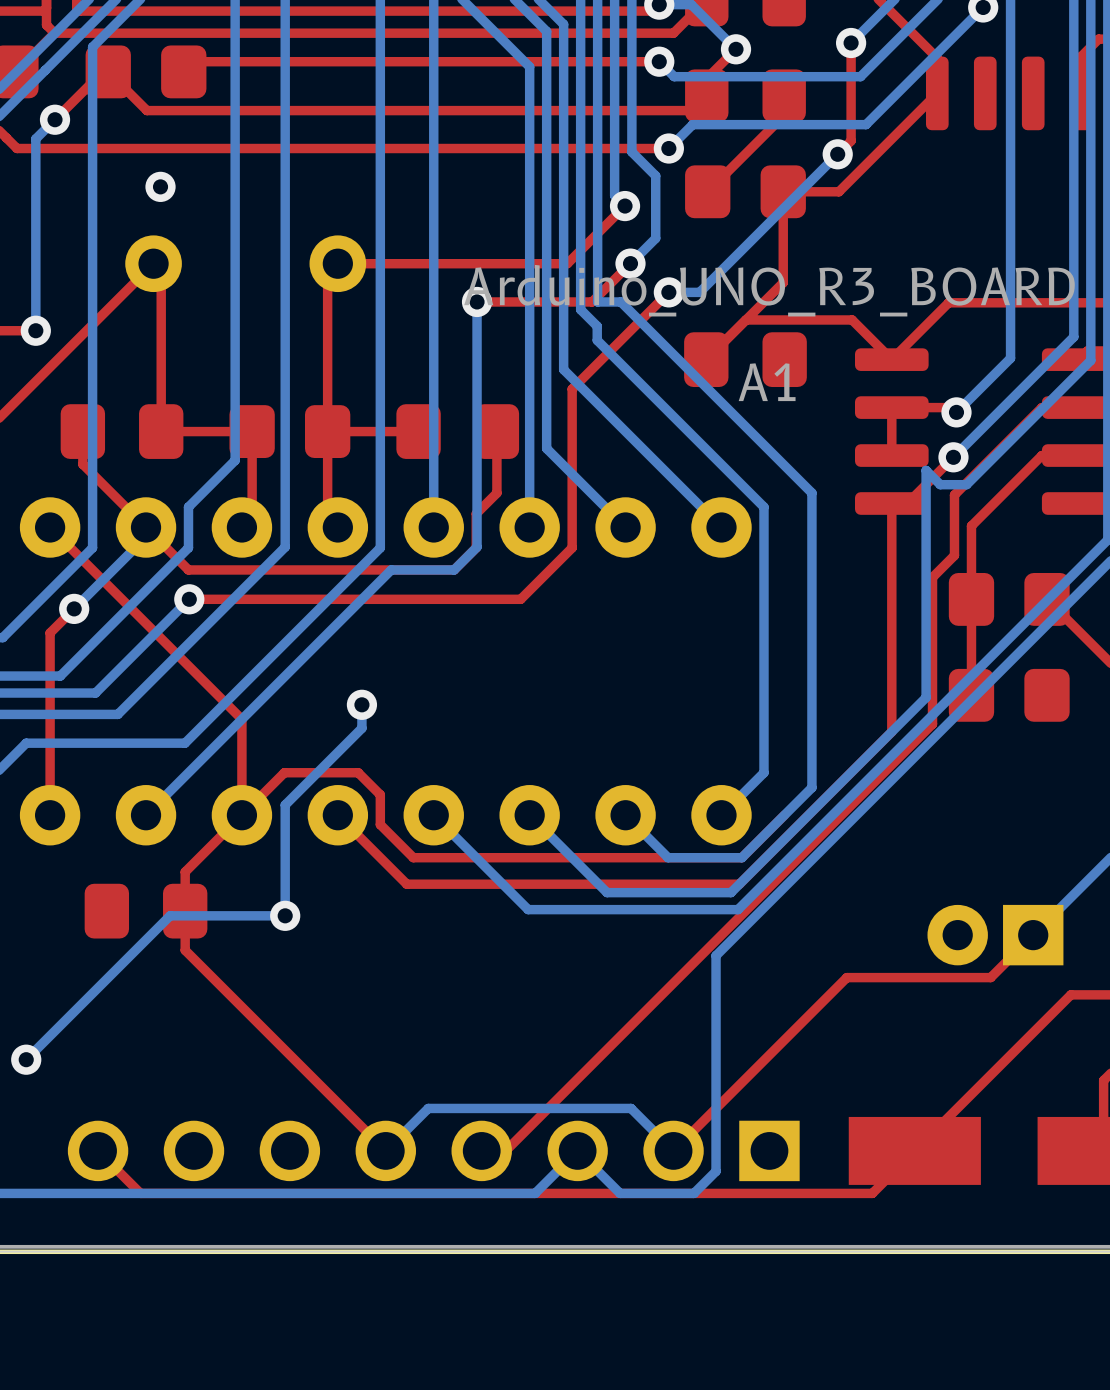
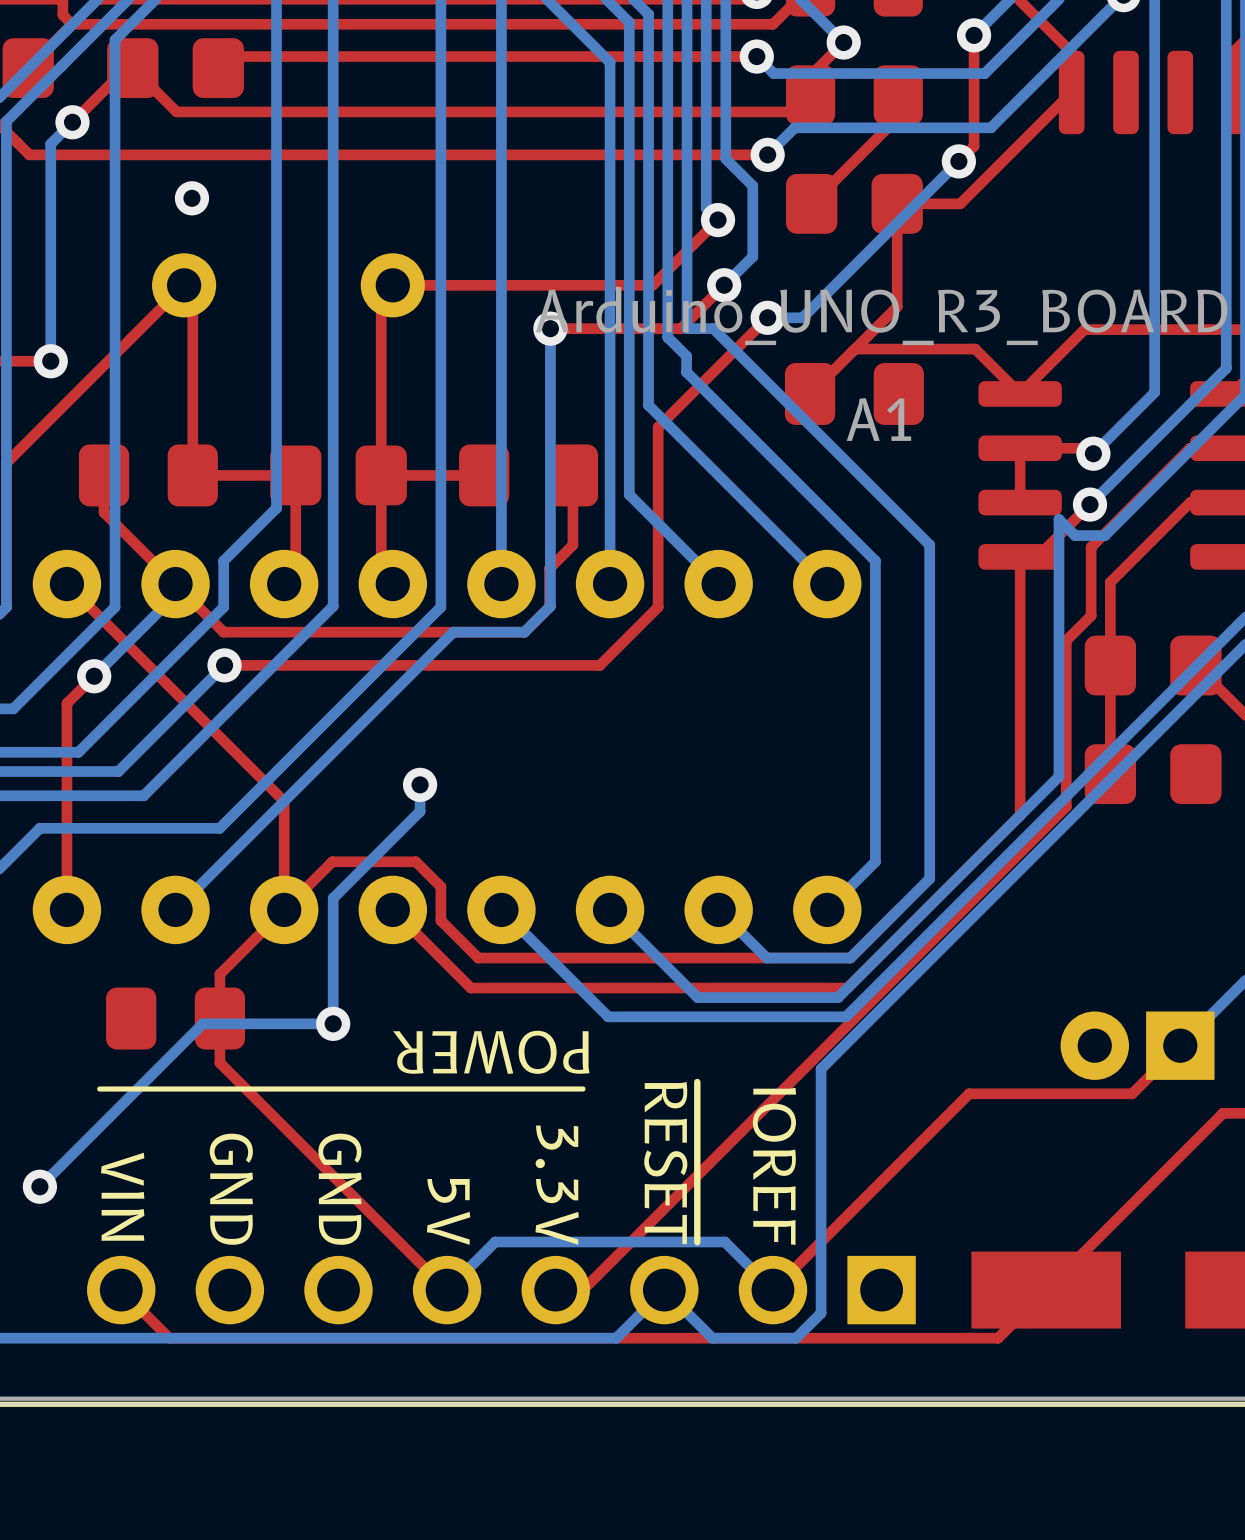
text: none -> POWER (491, 1052)
line: none -> (583, 1089) (99, 1089)
text: none -> ~{RESET} (670, 1163)
text: none -> IOREF (774, 1166)
text: none -> 3.3V (557, 1185)
text: none -> GND (231, 1189)
text: none -> GND (339, 1189)
text: none -> VIN (122, 1196)
text: none -> 5V (448, 1211)

